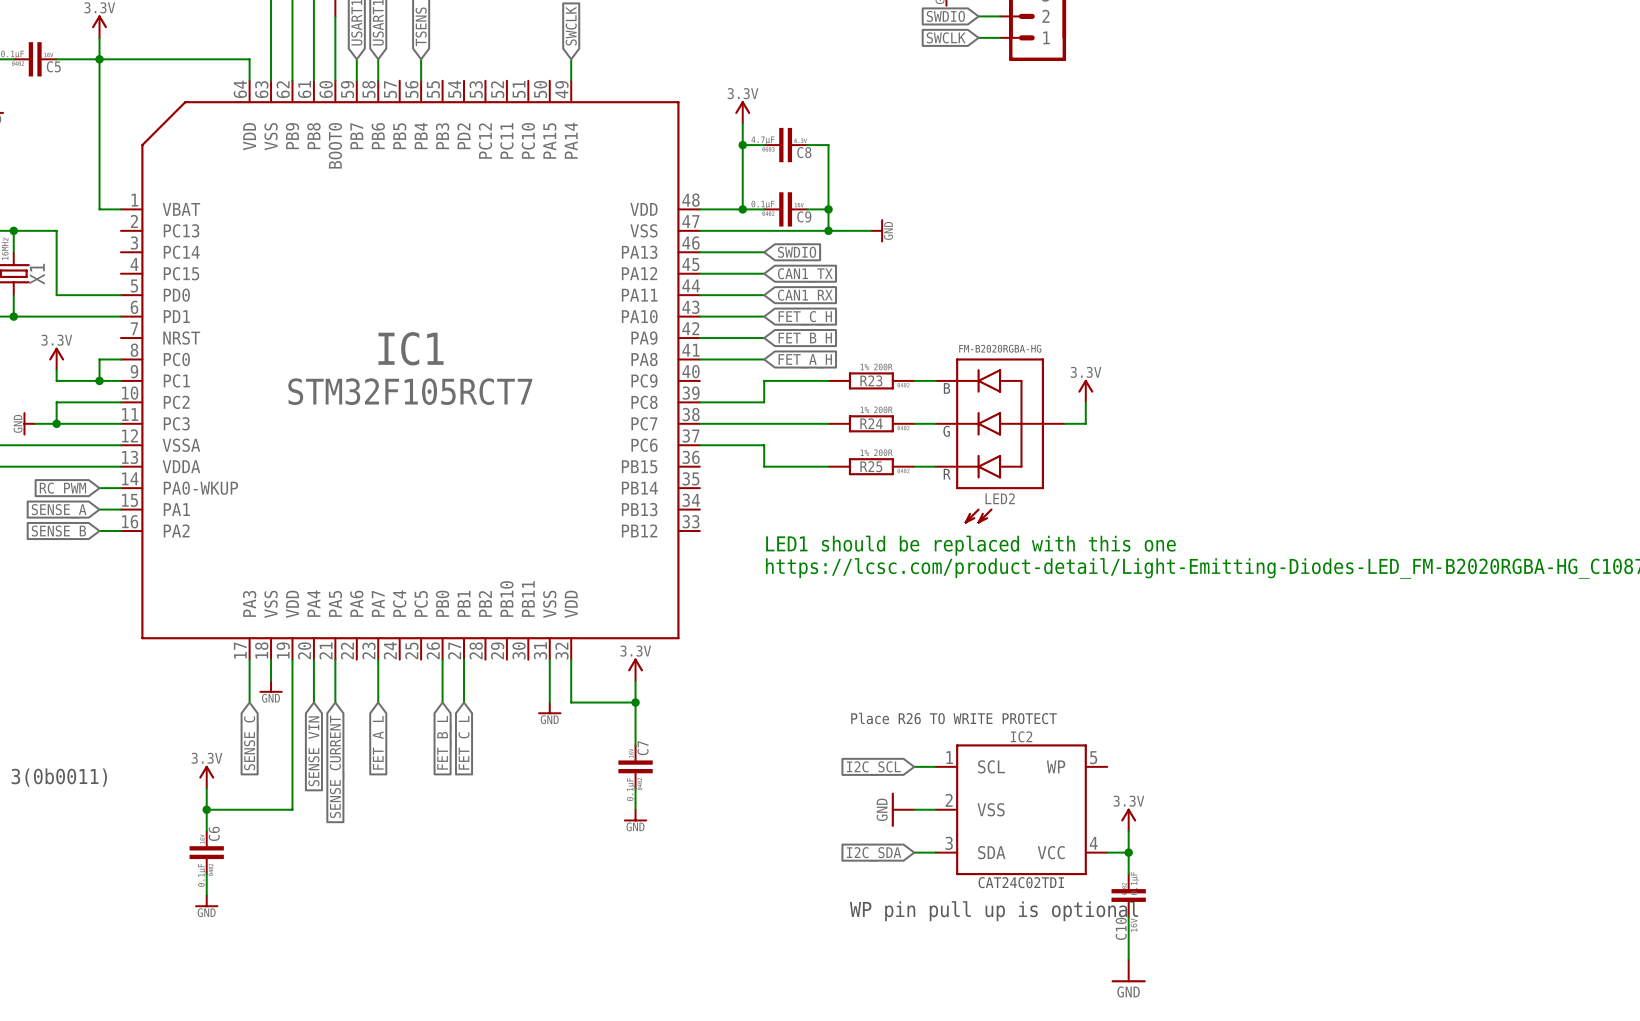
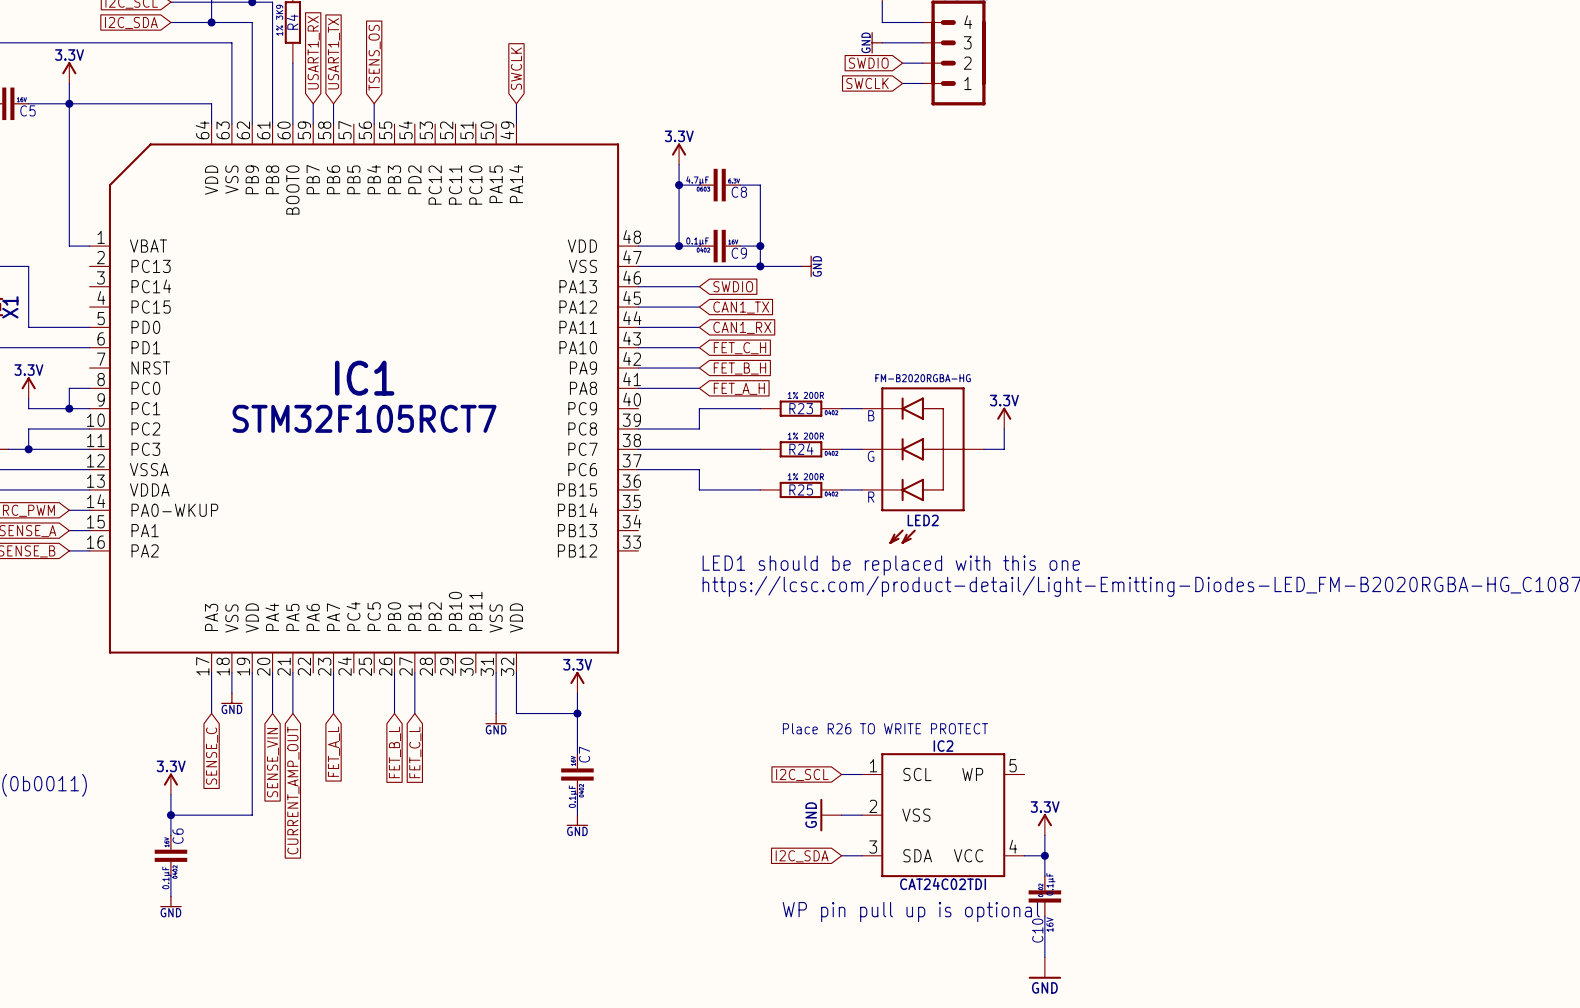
global label: SENSE_CURRENT (337, 766) -> CURRENT_AMP_OUT (293, 790)

